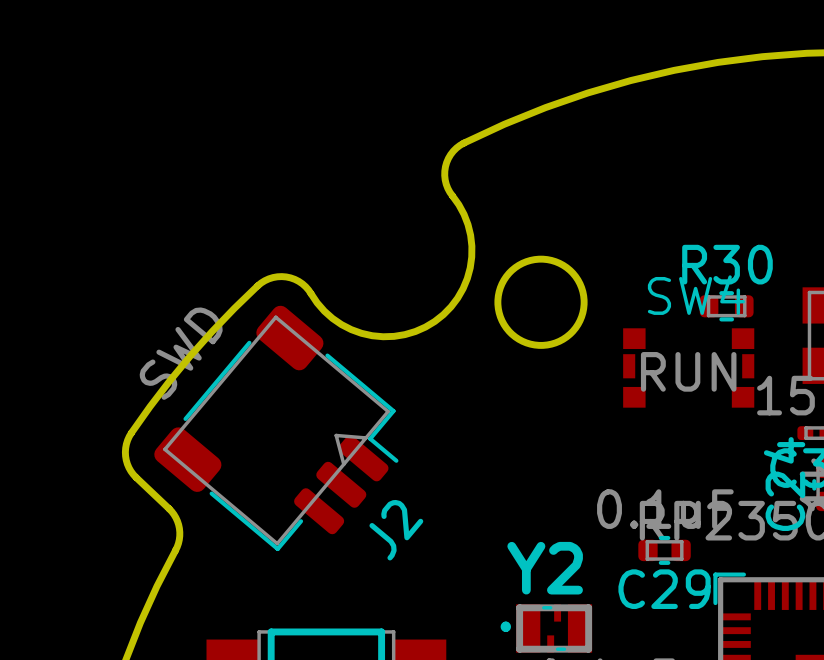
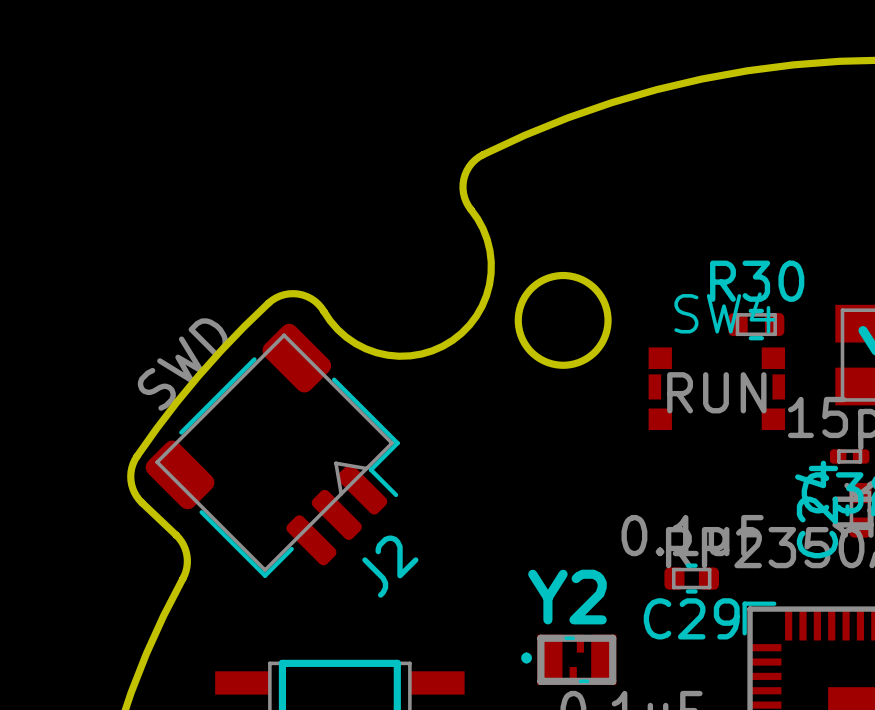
J2 rotation: 0° (276, 428) -> 5° clockwise (272, 450)

